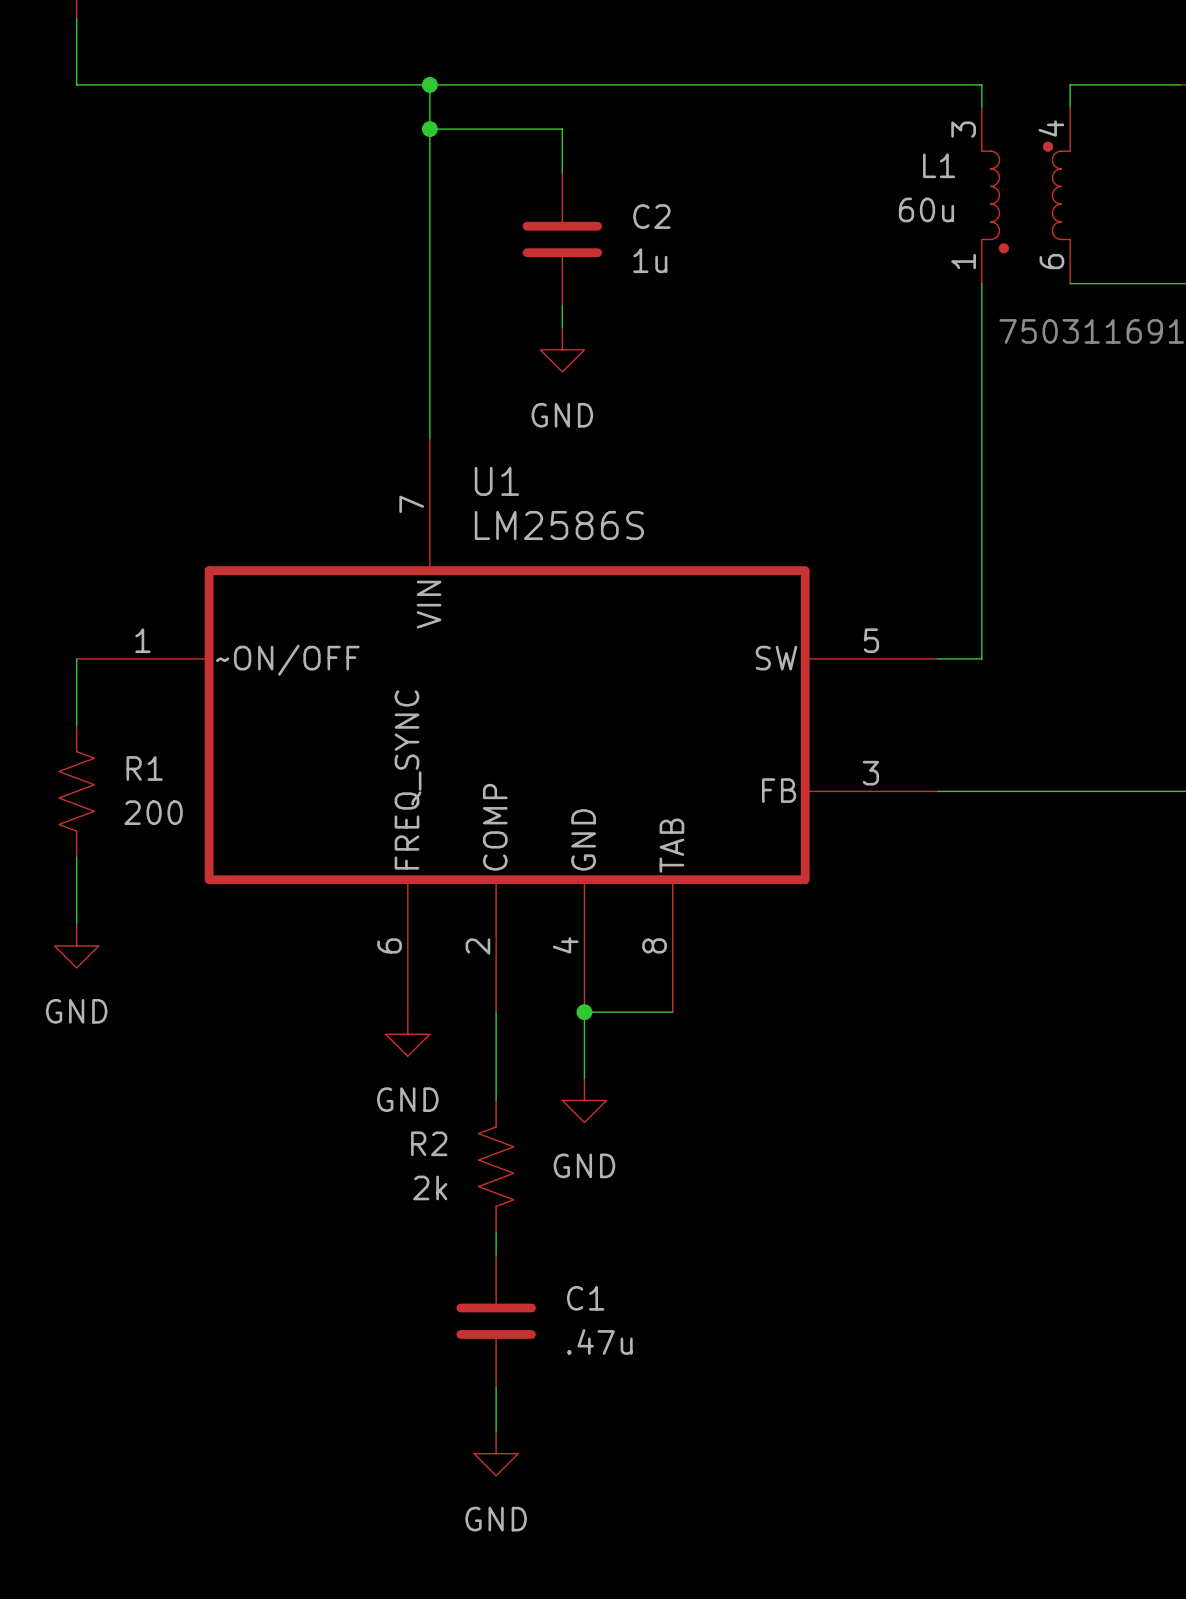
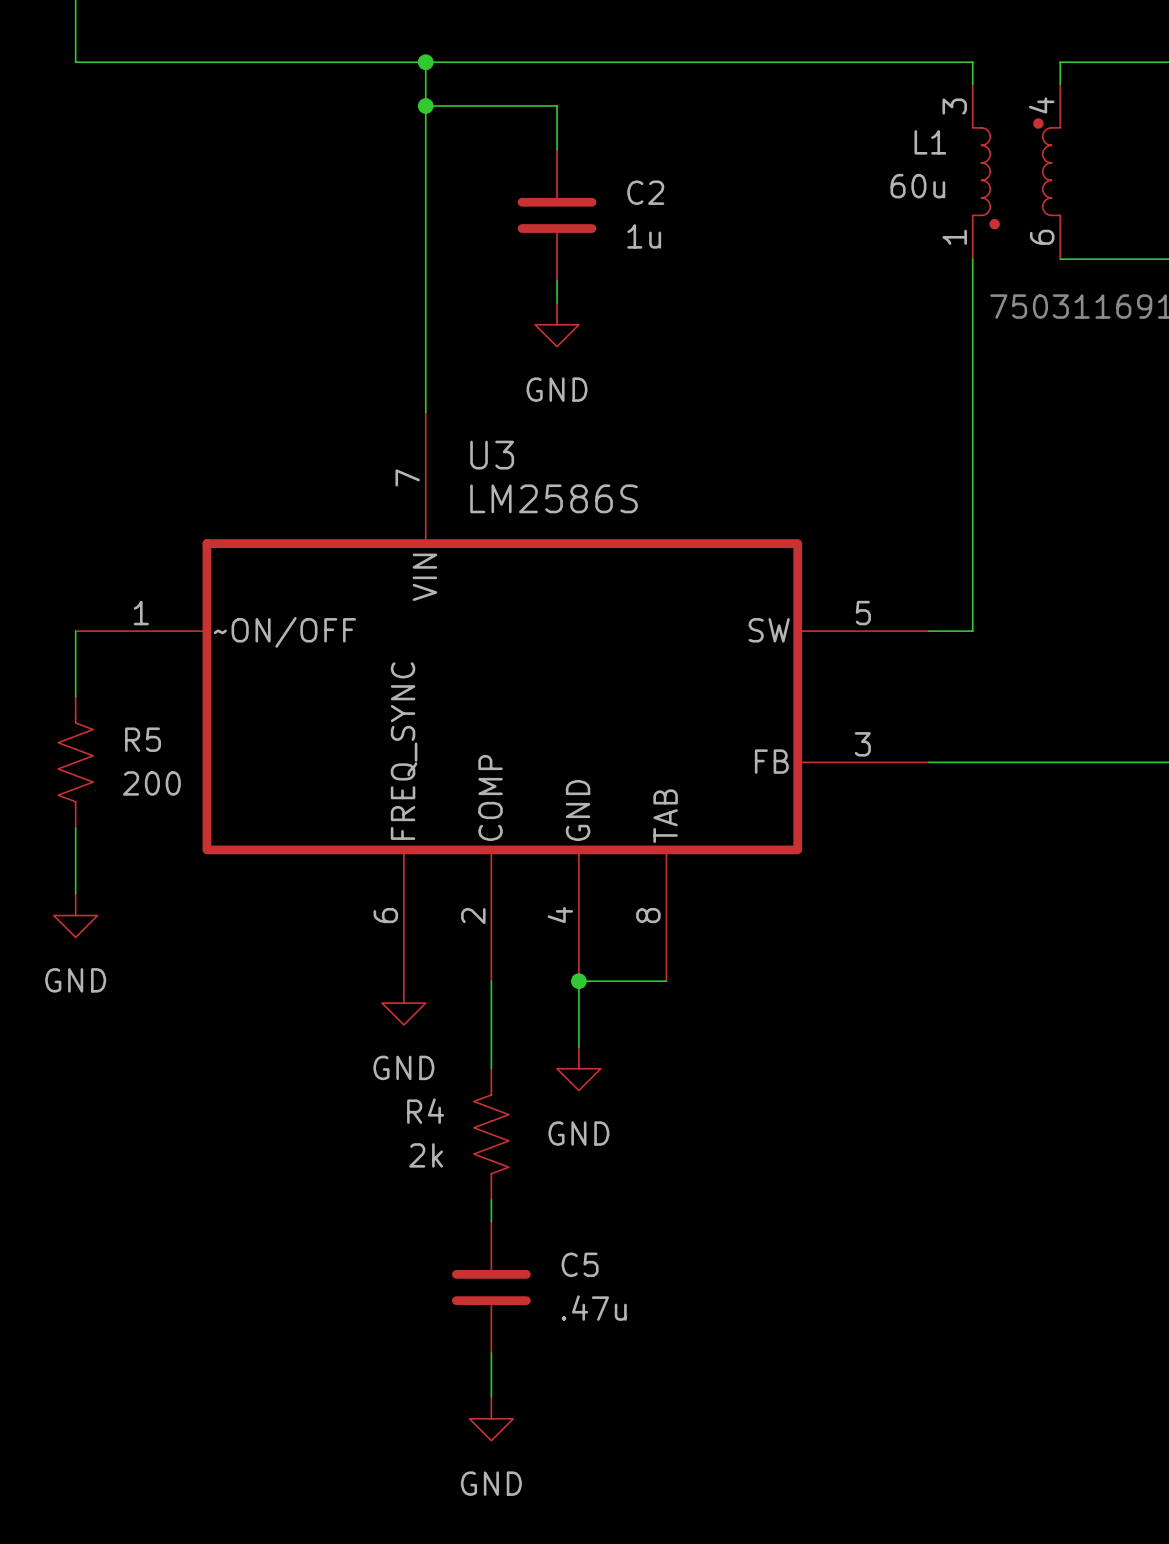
U1 name: U1 (496, 481) -> U3 (492, 455)
R1 name: R1 (144, 768) -> R5 (143, 739)
R2 name: R2 (429, 1143) -> R4 (425, 1111)
C1 name: C1 (585, 1298) -> C5 (580, 1264)

